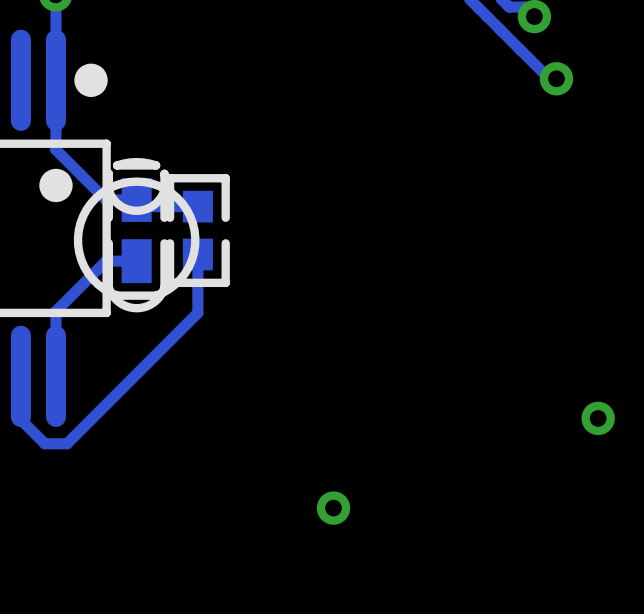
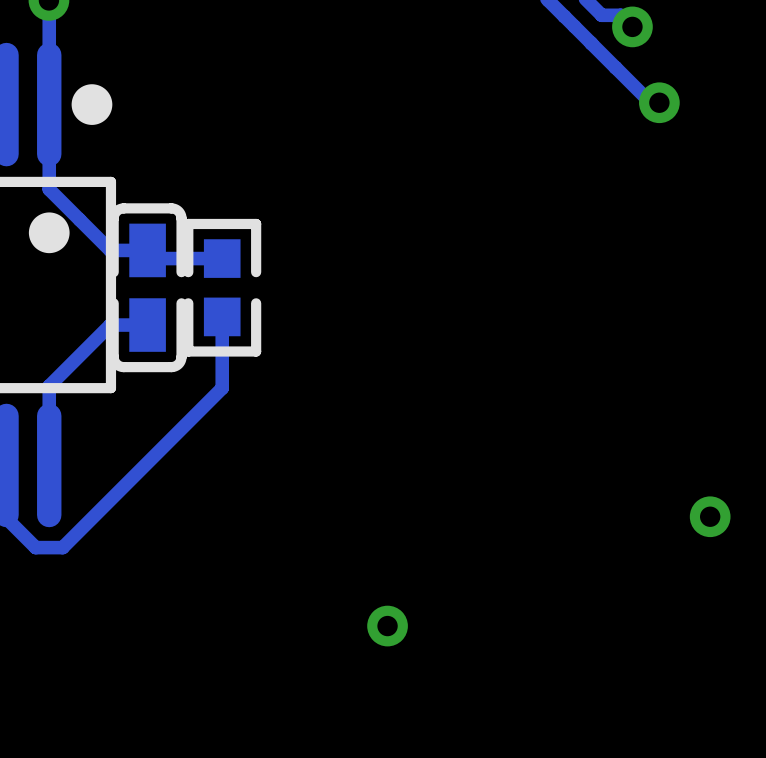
part footprint: [73, 157, 200, 313] -> [108, 203, 187, 373]

